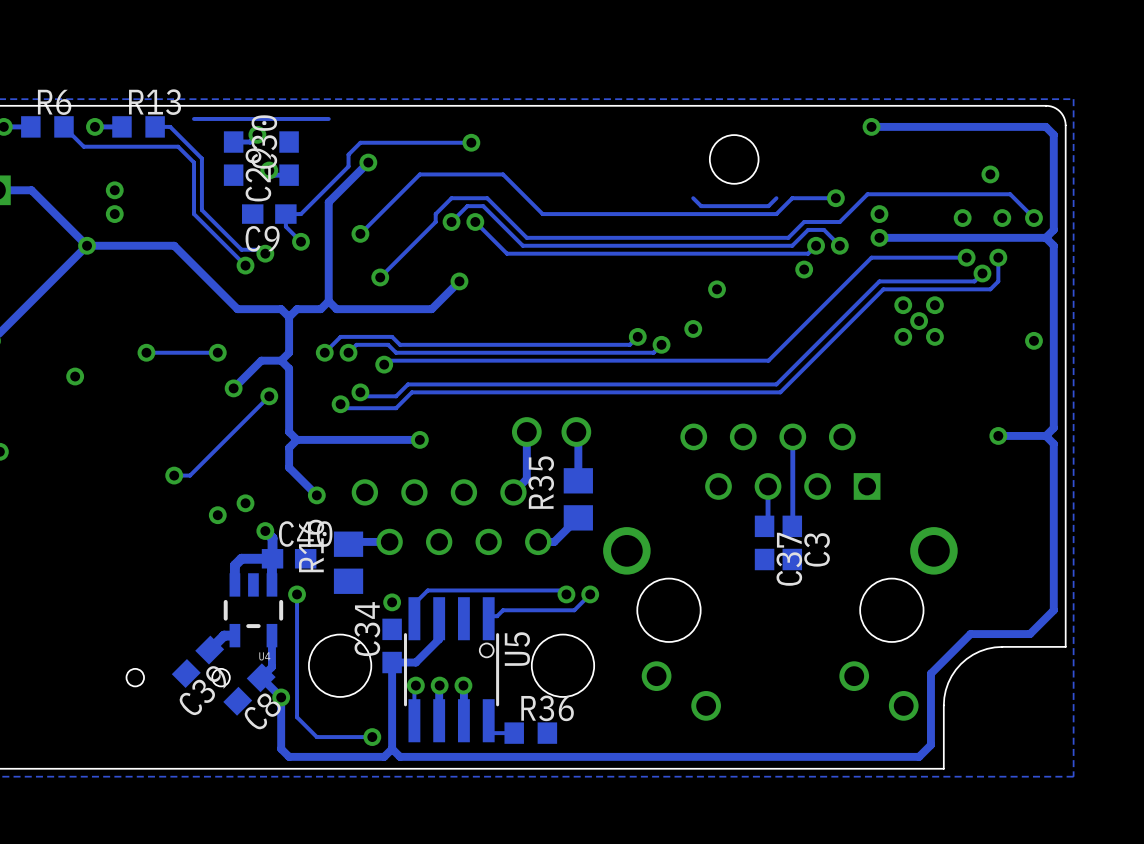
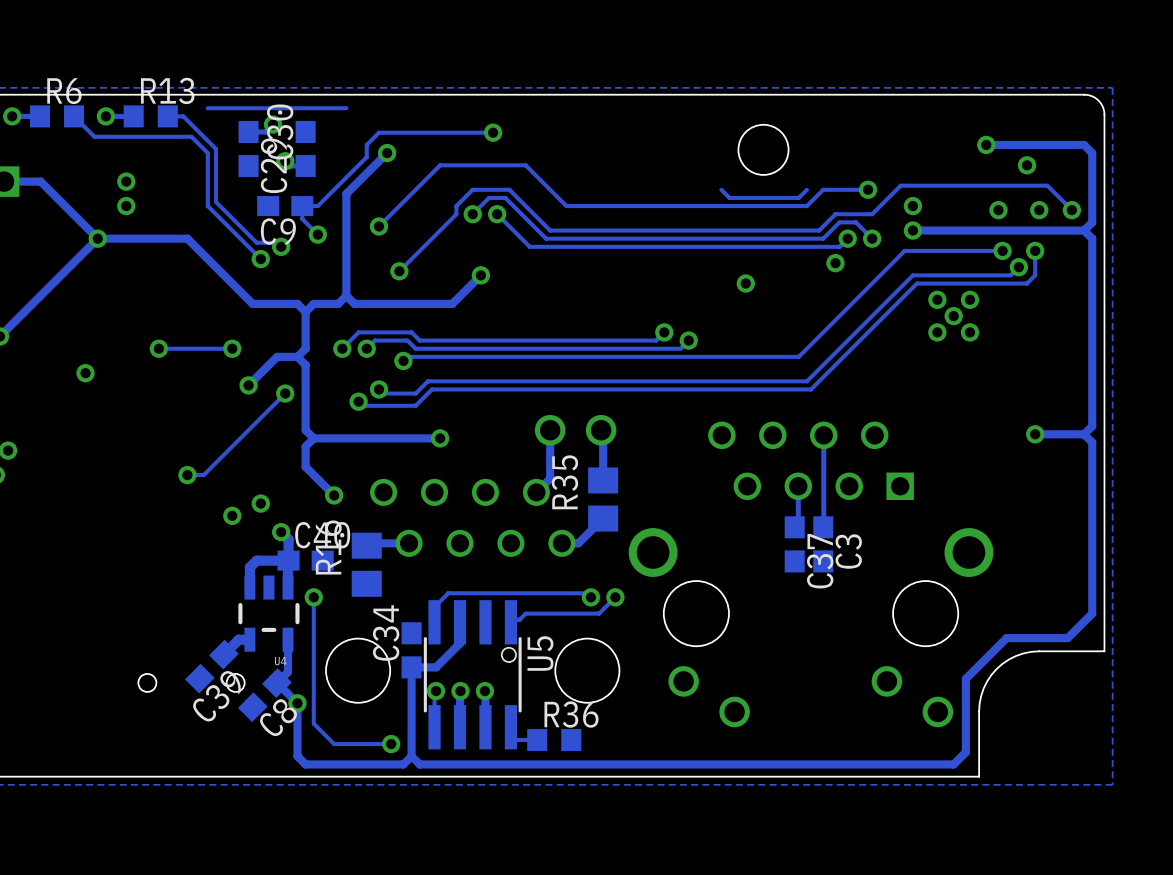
track: (871, 126) (1045, 126) (1053, 134) (1053, 162) -> (986, 144) (1084, 144) (1092, 153)
via position: (871, 126) -> (986, 144)
via: (693, 328) -> none
via: (1033, 340) -> none
via: (392, 602) -> none

